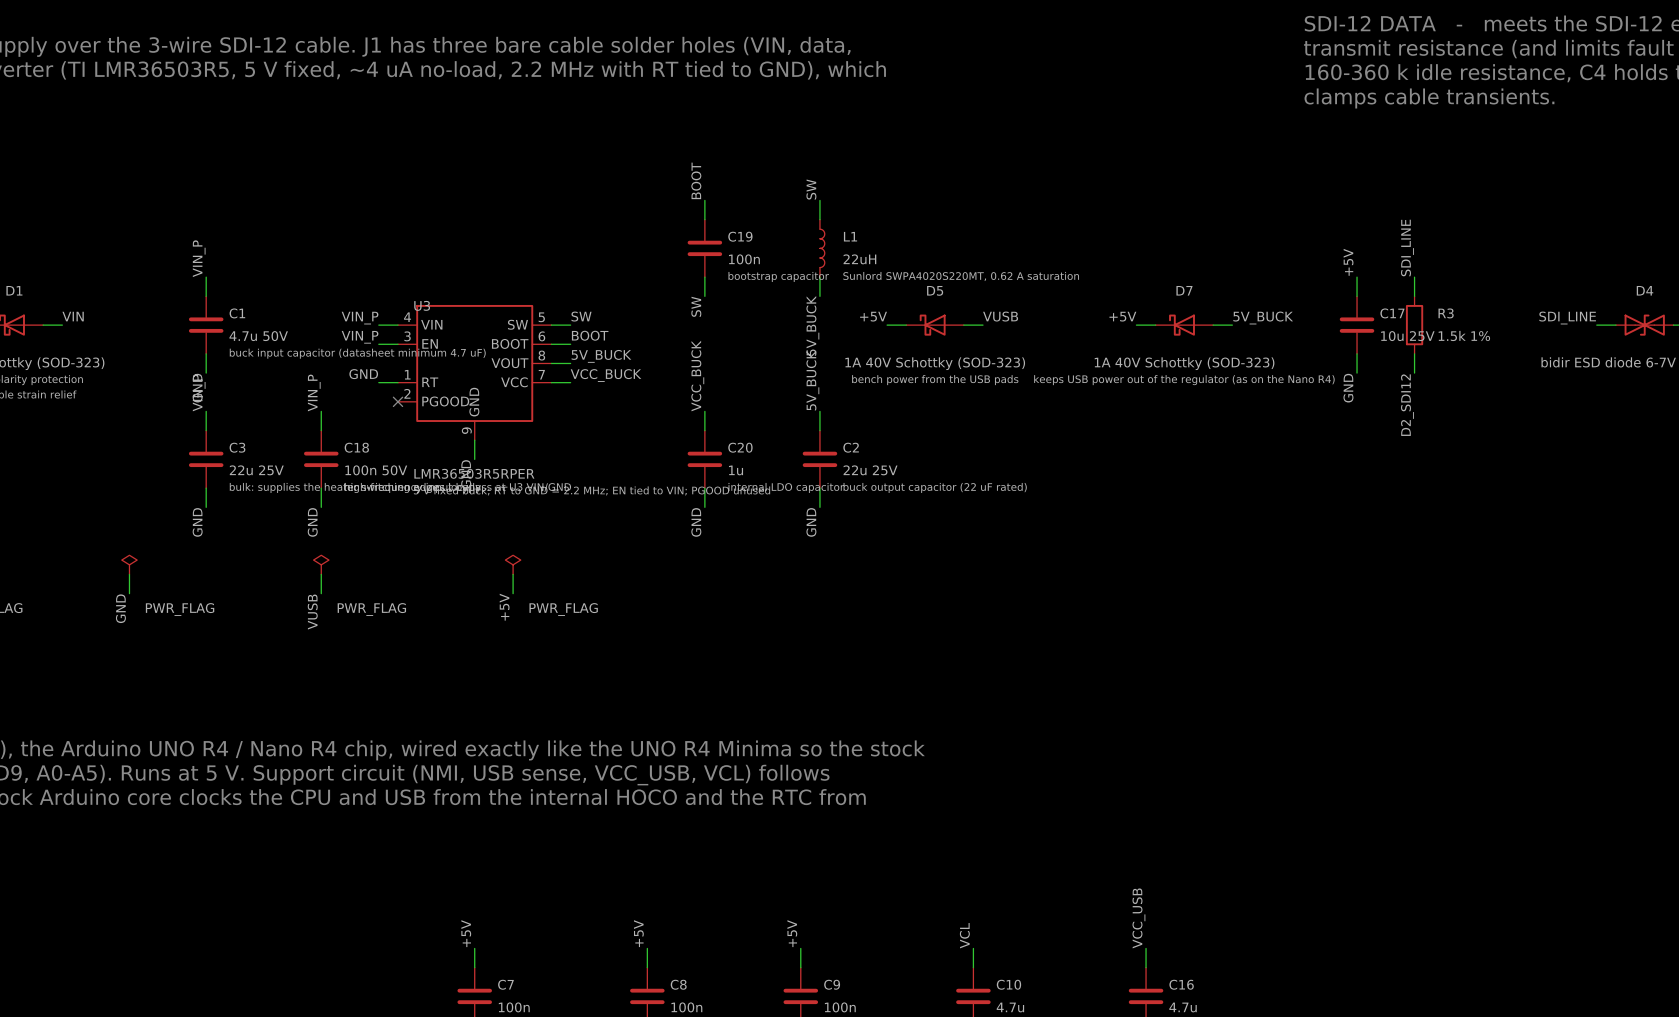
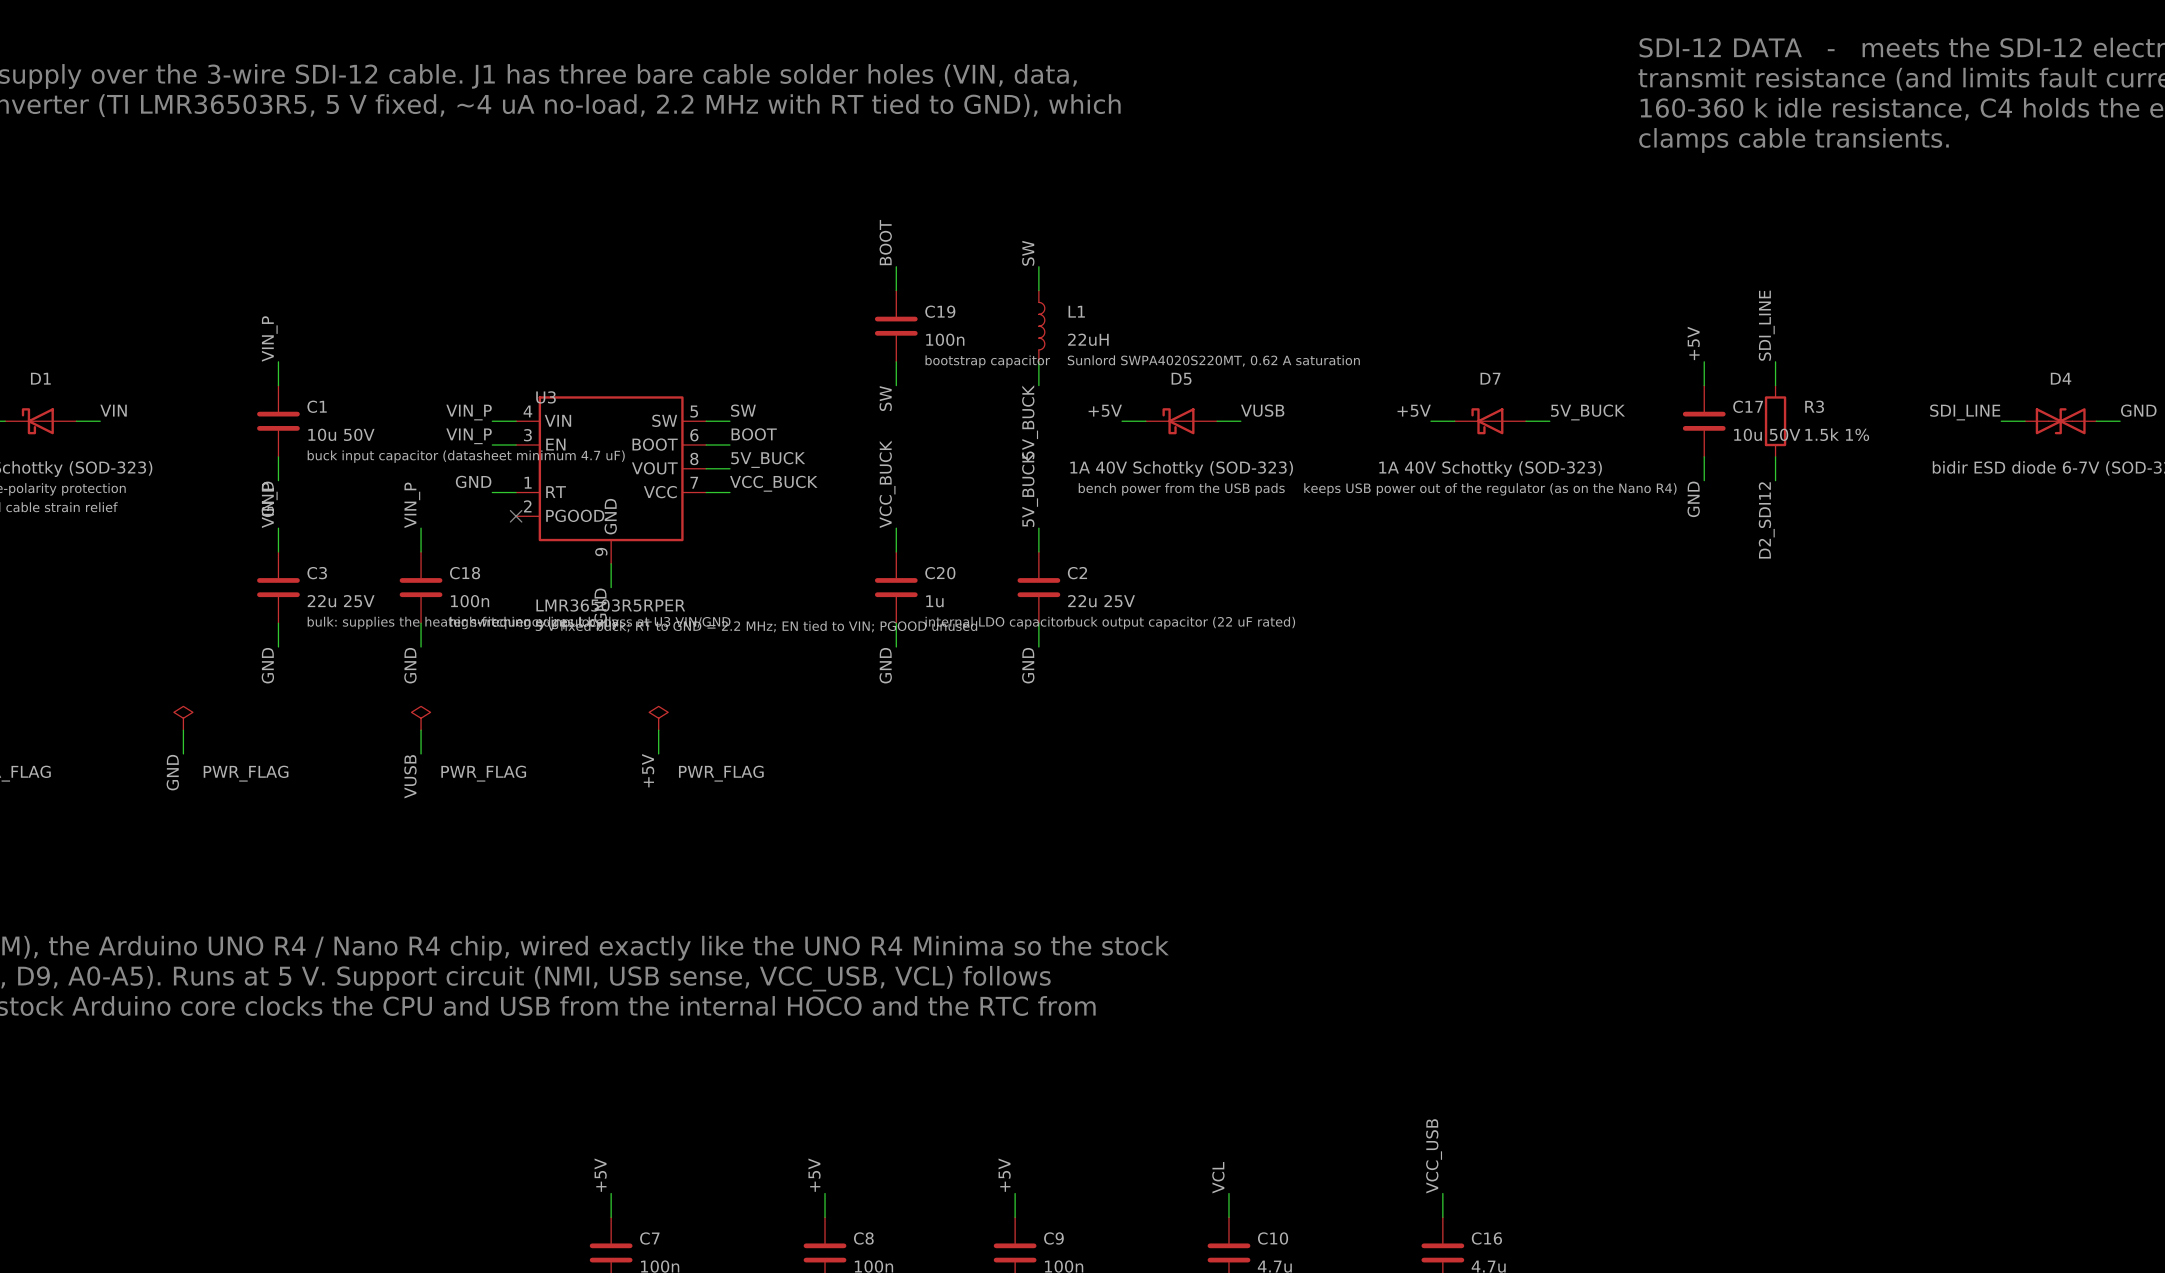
C1 value: 4.7u 50V (258, 336) -> 10u 50V (341, 434)
C17 value: 10u 25V (1407, 336) -> 10u 50V (1767, 434)
C18 value: 100n 50V (376, 470) -> 100n (470, 601)

